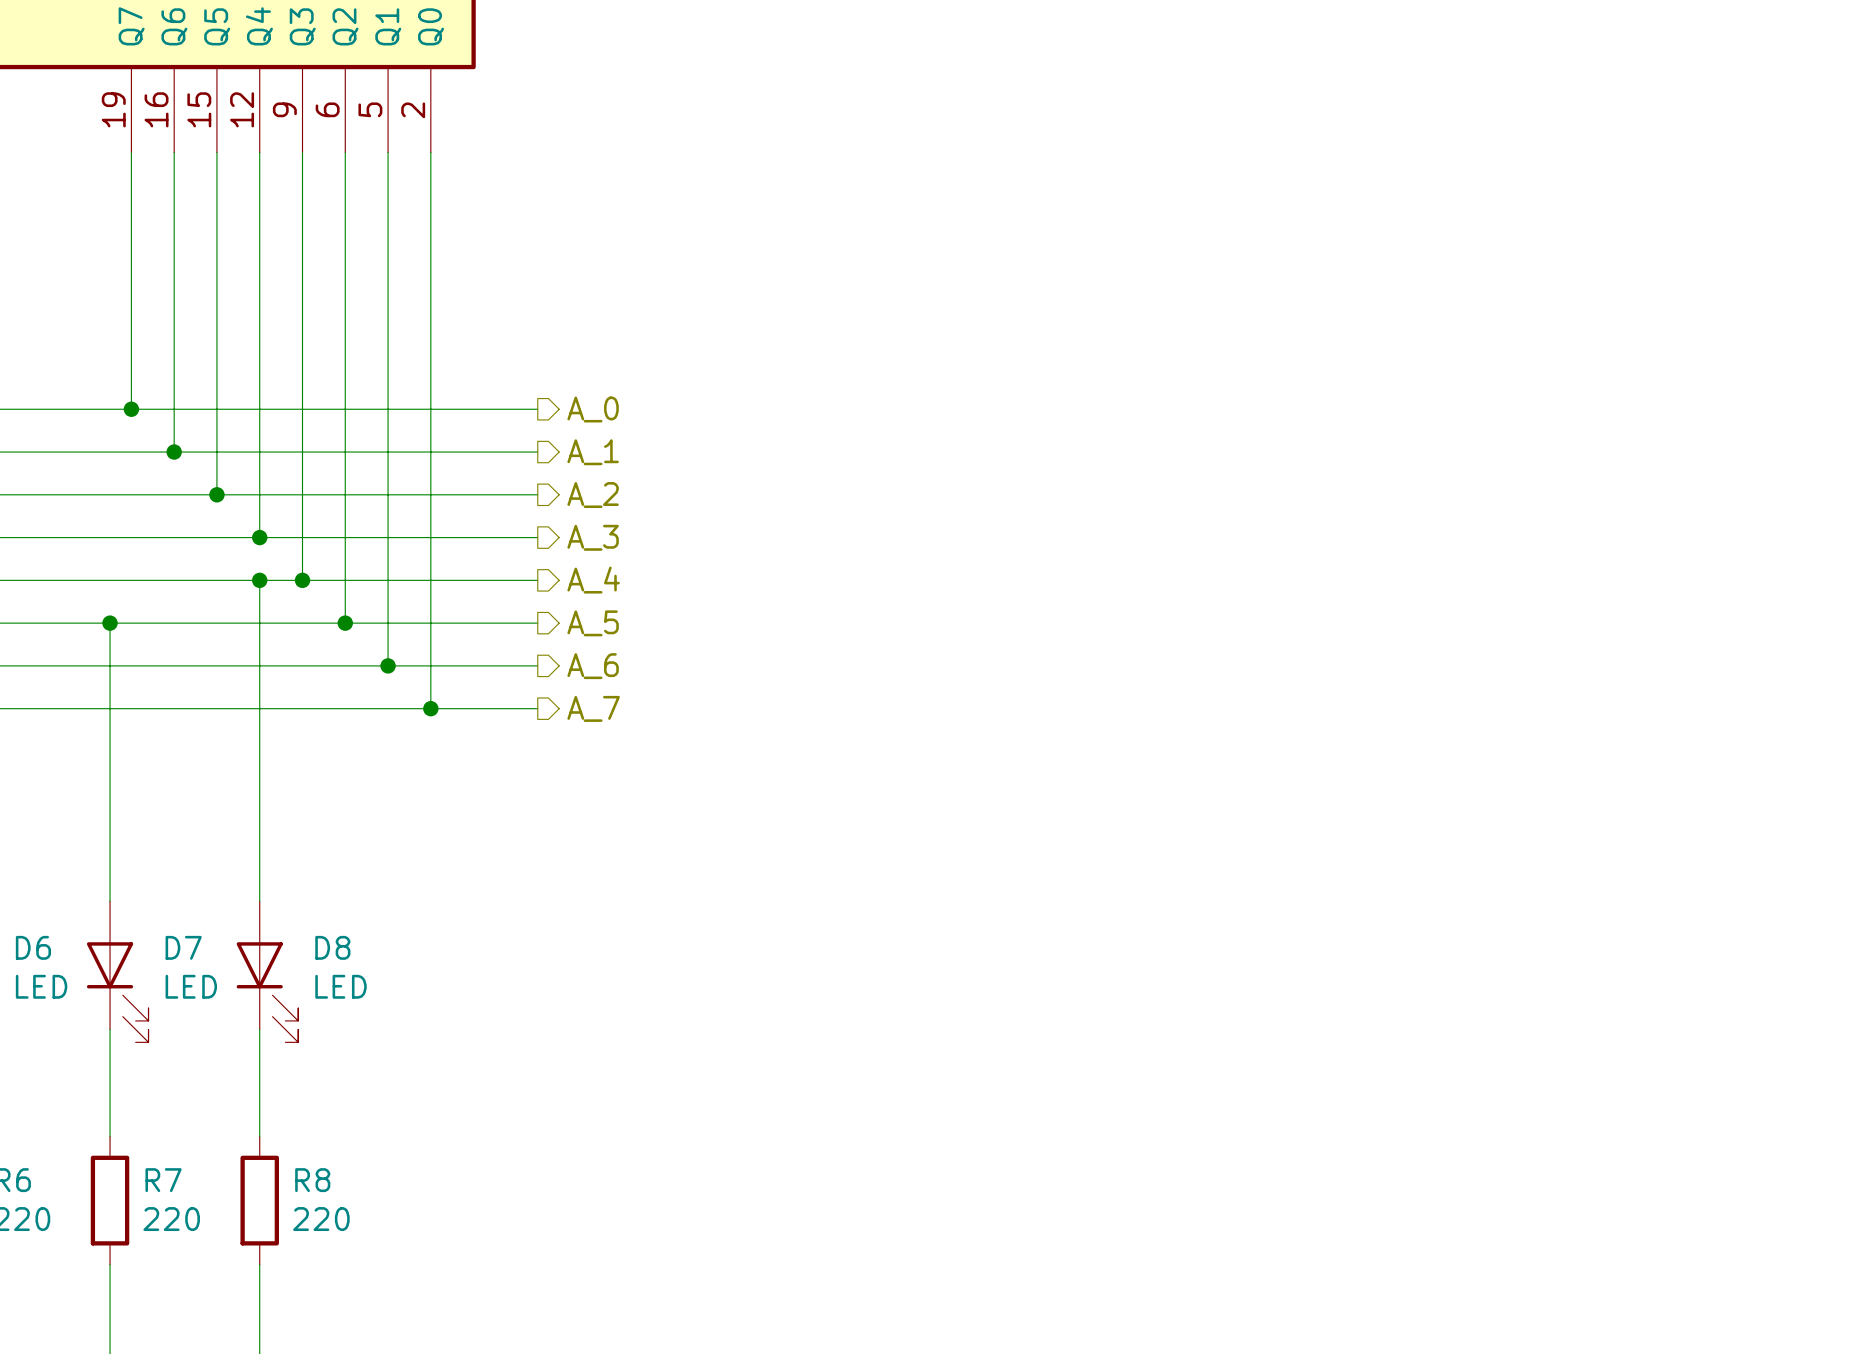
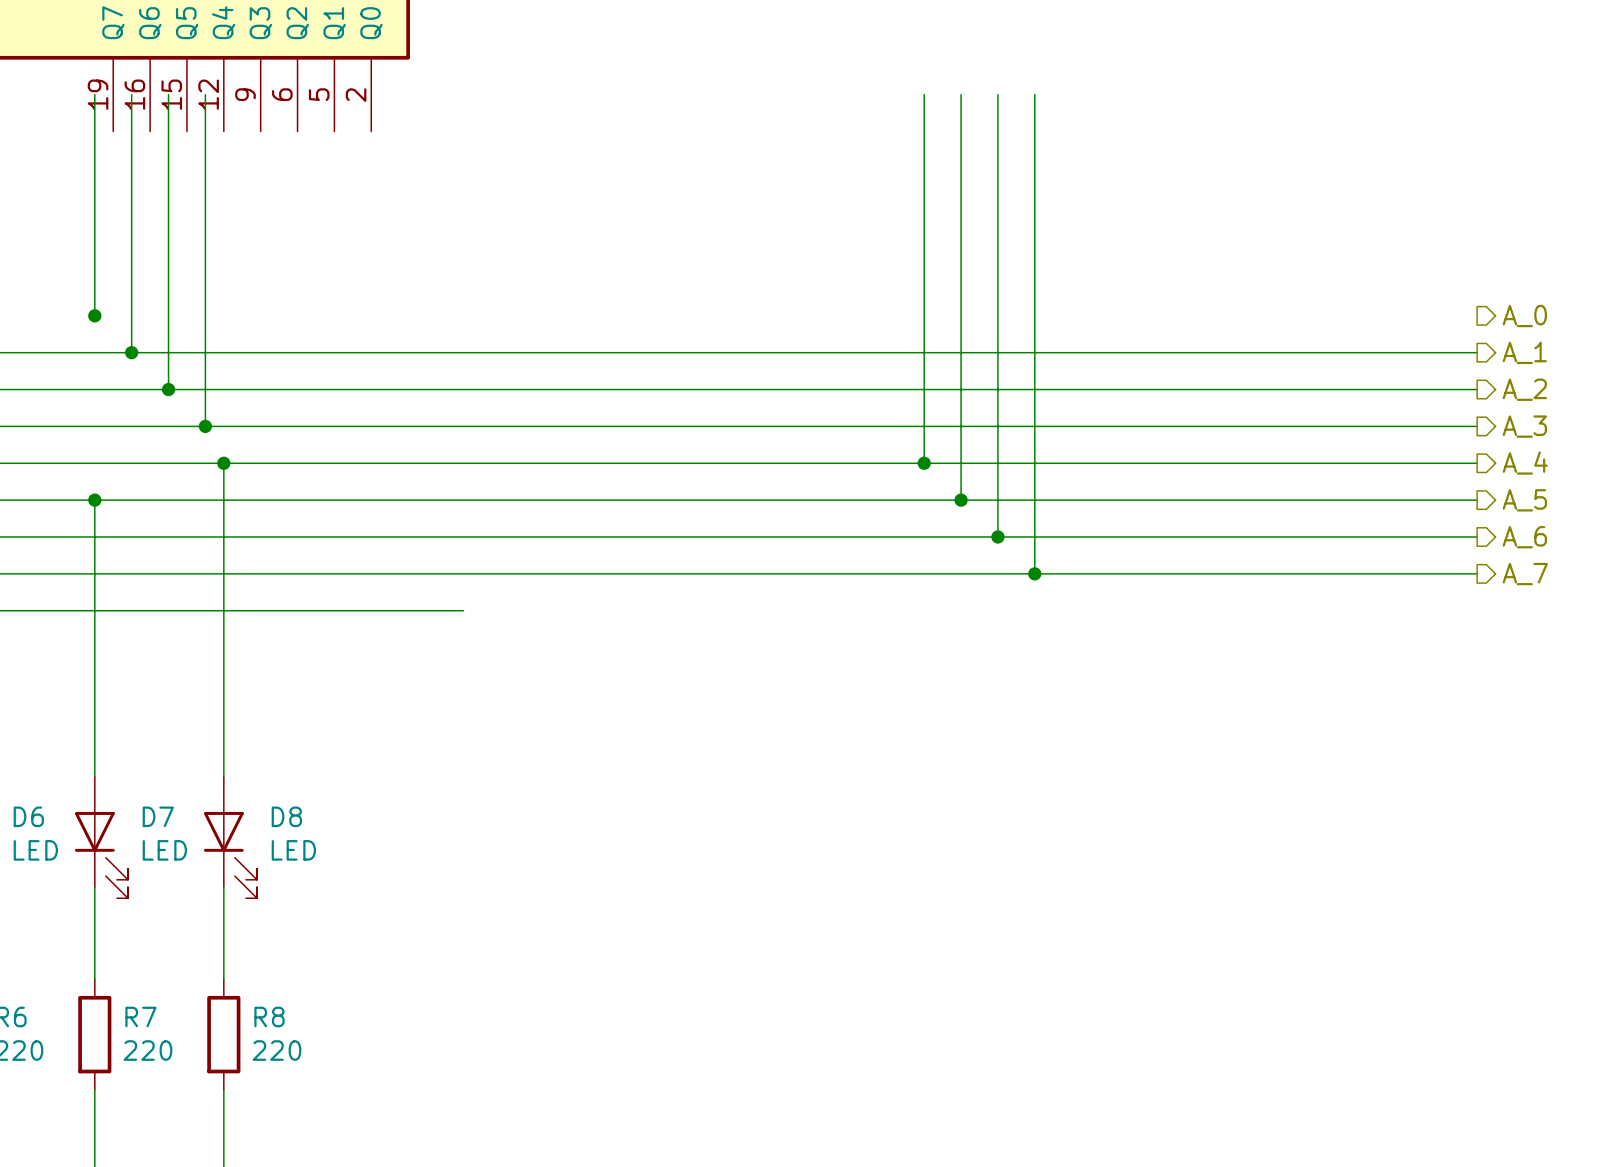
wire: none -> (205, 94) (205, 426)
wire: none -> (924, 94) (924, 463)
wire: none -> (961, 94) (961, 500)
wire: none -> (997, 94) (997, 536)
wire: none -> (1034, 94) (1034, 573)
wire: (131, 152) (131, 409) -> (94, 94) (94, 315)
wire: (174, 152) (174, 452) -> (131, 94) (131, 352)
wire: (216, 152) (216, 494) -> (168, 94) (168, 389)
wire: (259, 152) (259, 537) -> (223, 500) (223, 463)
wire: (302, 152) (302, 580) -> none
wire: (345, 152) (345, 623) -> none
wire: (388, 152) (388, 665) -> none
wire: (430, 152) (430, 708) -> none
junction: none -> (94, 315)
hierarchical label: none -> A_0 (1524, 316)
junction position: (131, 409) -> (131, 352)
wire: none -> (463, 352) (1477, 352)
hierarchical label: A_0 (593, 409) -> none
hierarchical label: none -> A_1 (1524, 352)
junction position: (174, 452) -> (168, 389)
wire: none -> (463, 389) (1477, 389)
hierarchical label: A_1 (593, 452) -> none
hierarchical label: none -> A_2 (1524, 389)
junction position: (216, 494) -> (205, 426)
wire: none -> (463, 426) (1477, 426)
hierarchical label: A_2 (593, 495) -> none
hierarchical label: none -> A_3 (1524, 426)
wire: none -> (463, 463) (1477, 463)
hierarchical label: A_3 (593, 537) -> none
junction: none -> (924, 463)
hierarchical label: none -> A_4 (1525, 463)
wire: none -> (94, 500) (94, 536)
junction: (259, 580) -> none
junction: (302, 580) -> none
wire: none -> (463, 500) (1477, 500)
hierarchical label: A_4 (593, 580) -> none
junction: none -> (961, 500)
hierarchical label: none -> A_5 (1524, 500)
junction position: (110, 623) -> (94, 500)
junction: (345, 623) -> none
wire: none -> (463, 536) (1477, 536)
hierarchical label: A_5 (593, 623) -> none
junction: none -> (997, 536)
hierarchical label: none -> A_6 (1524, 537)
junction: (388, 665) -> none
wire: none -> (463, 573) (1477, 573)
junction: none -> (1034, 573)
hierarchical label: A_6 (593, 666) -> none
hierarchical label: none -> A_7 (1525, 574)
junction: (430, 708) -> none
hierarchical label: A_7 (593, 708) -> none

